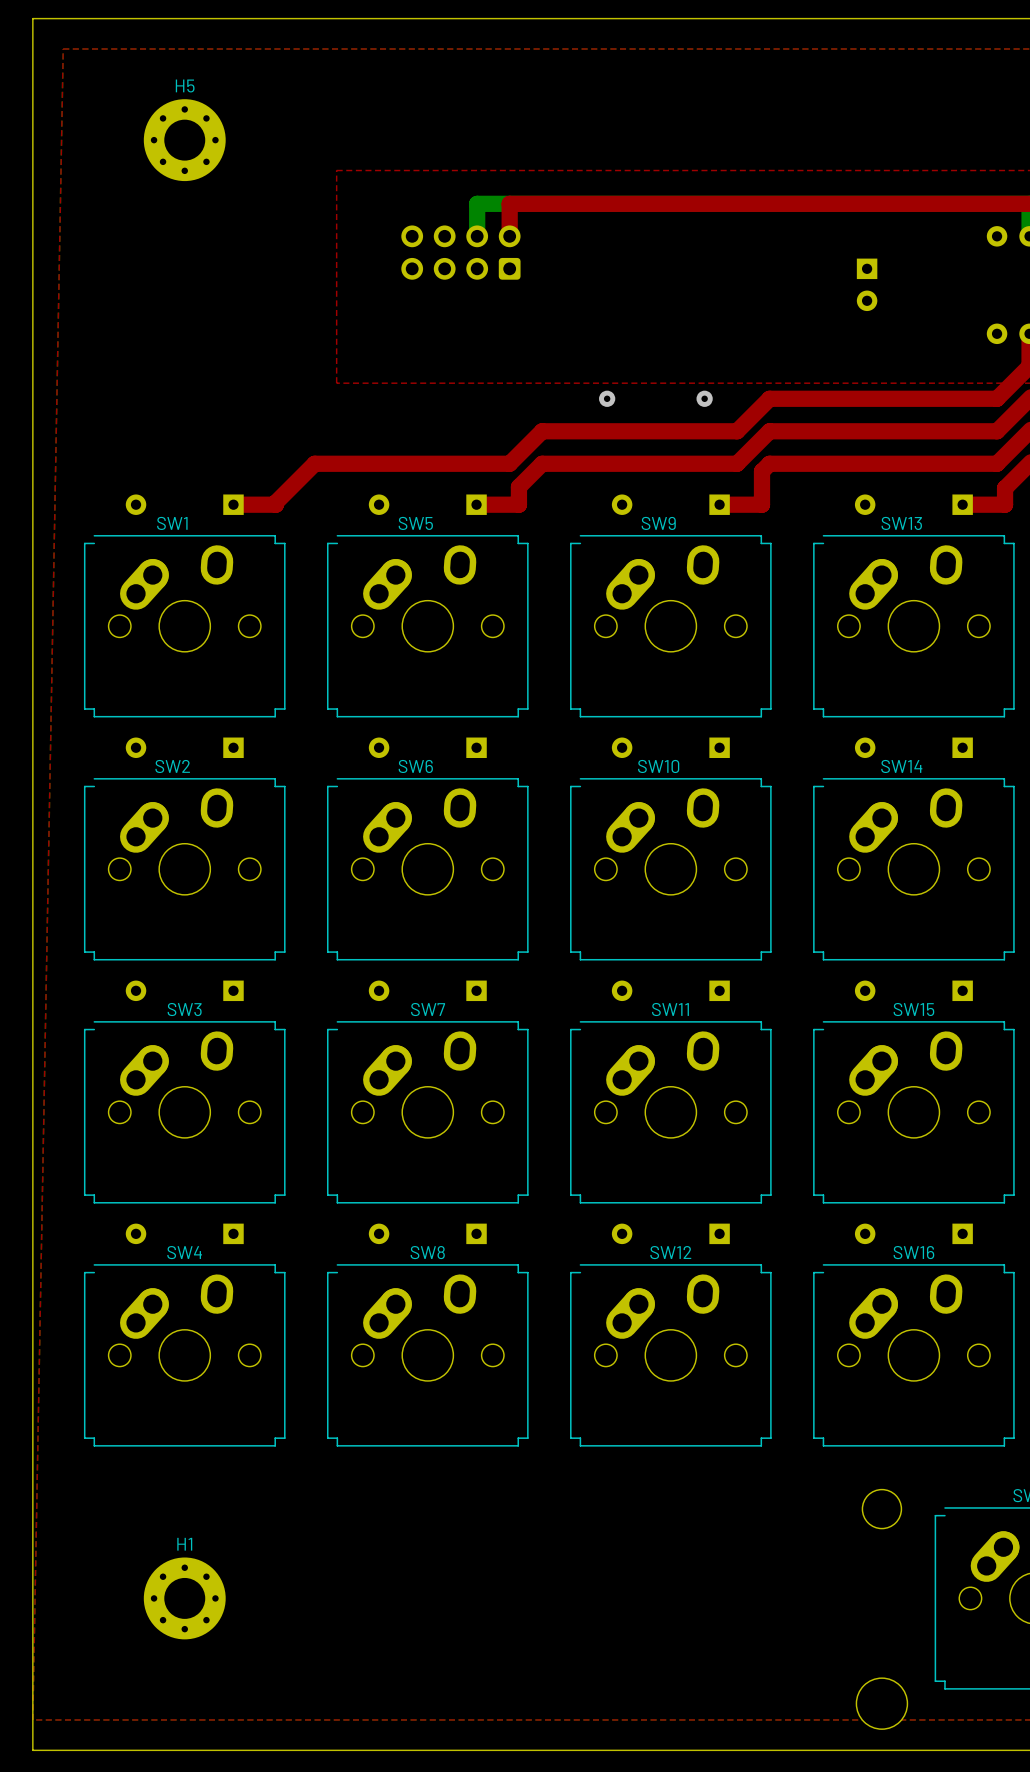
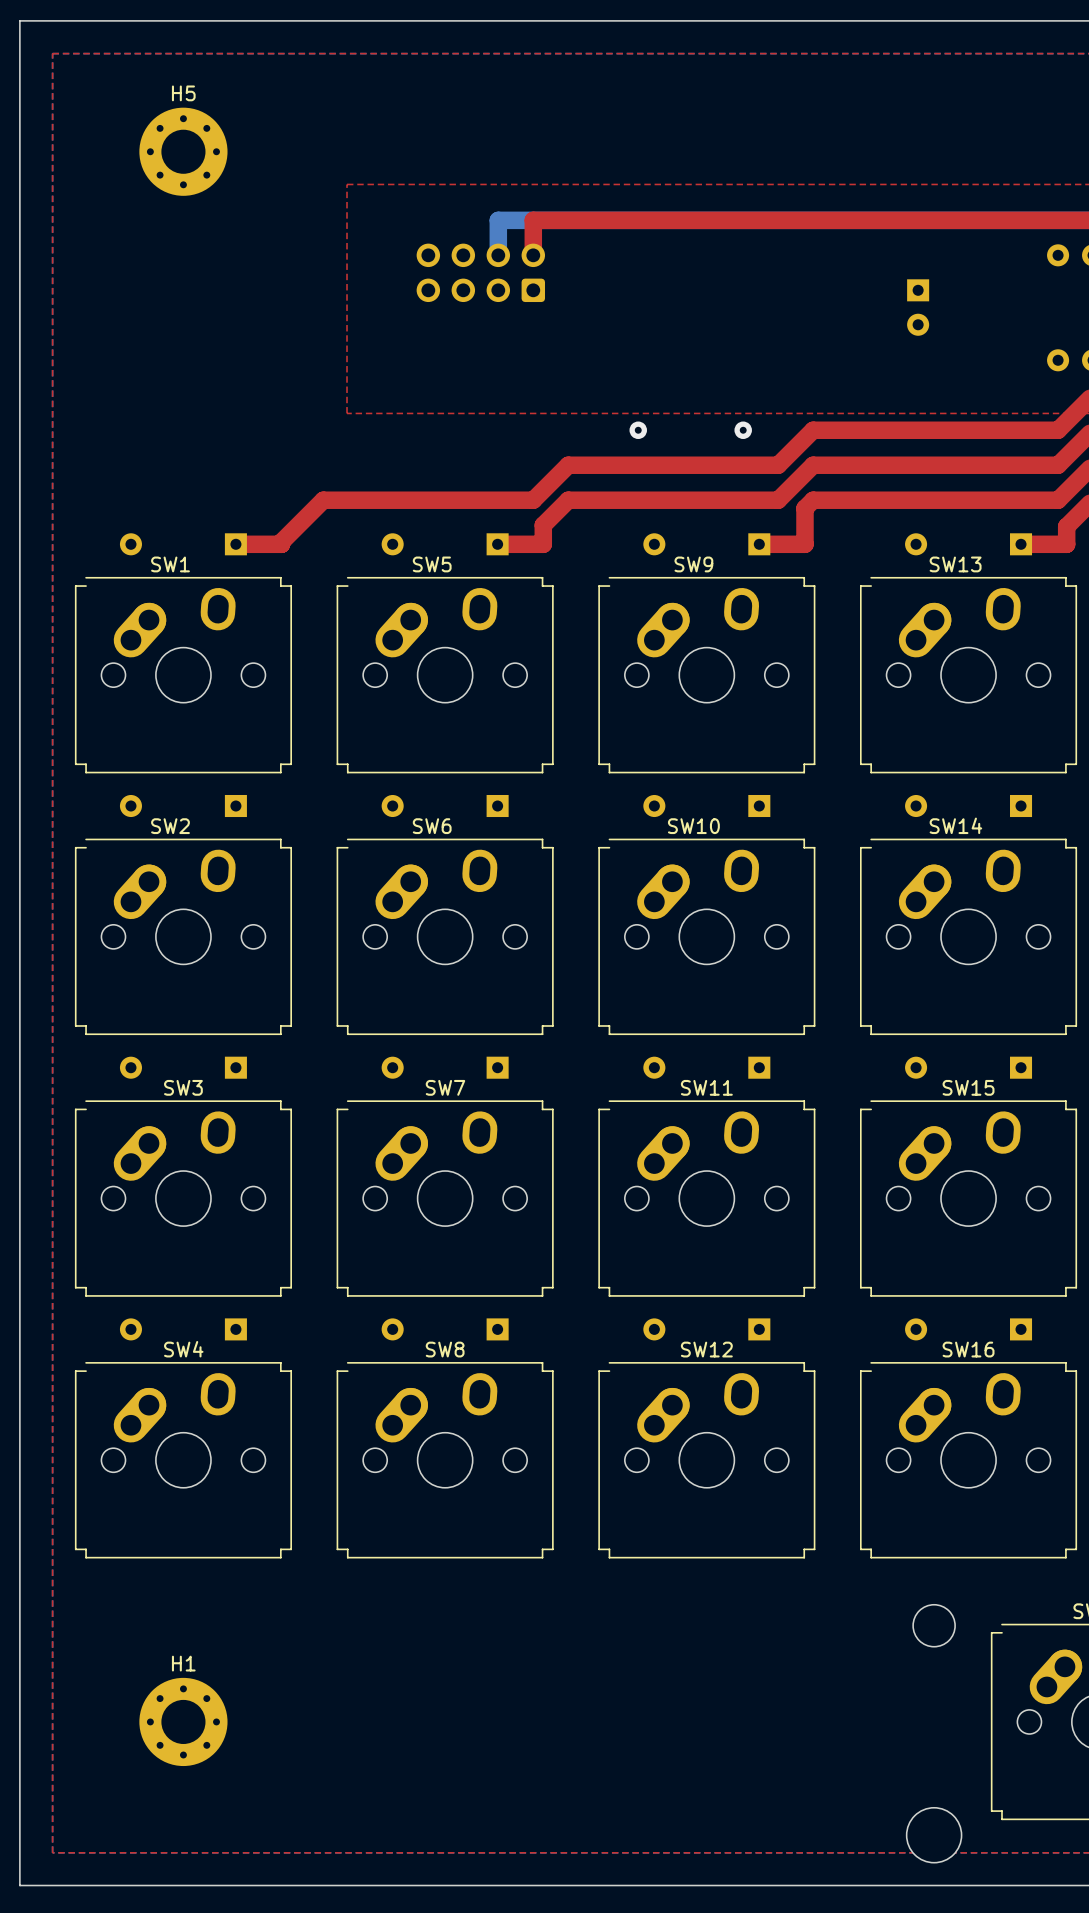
top zone outline: (63, 48) (32, 1719) (63, 1719) -> (52, 53) (52, 1852)

